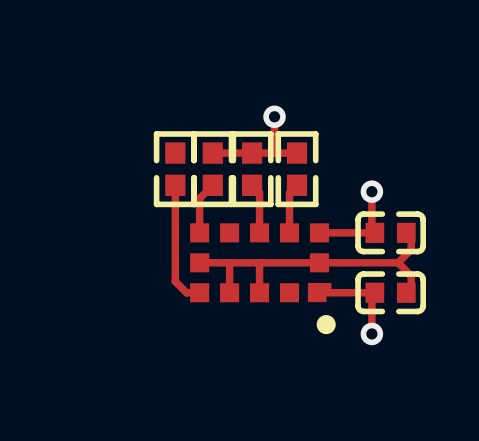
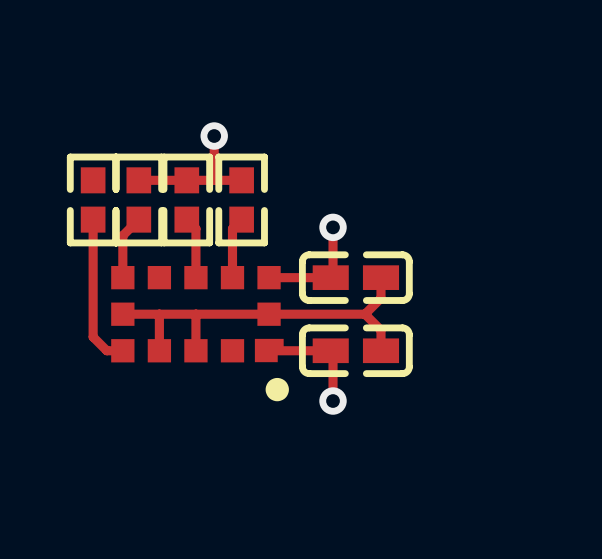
part footprint: [355, 211, 426, 255] -> [298, 251, 413, 304]
part footprint: [355, 271, 426, 315] -> [298, 324, 413, 378]

